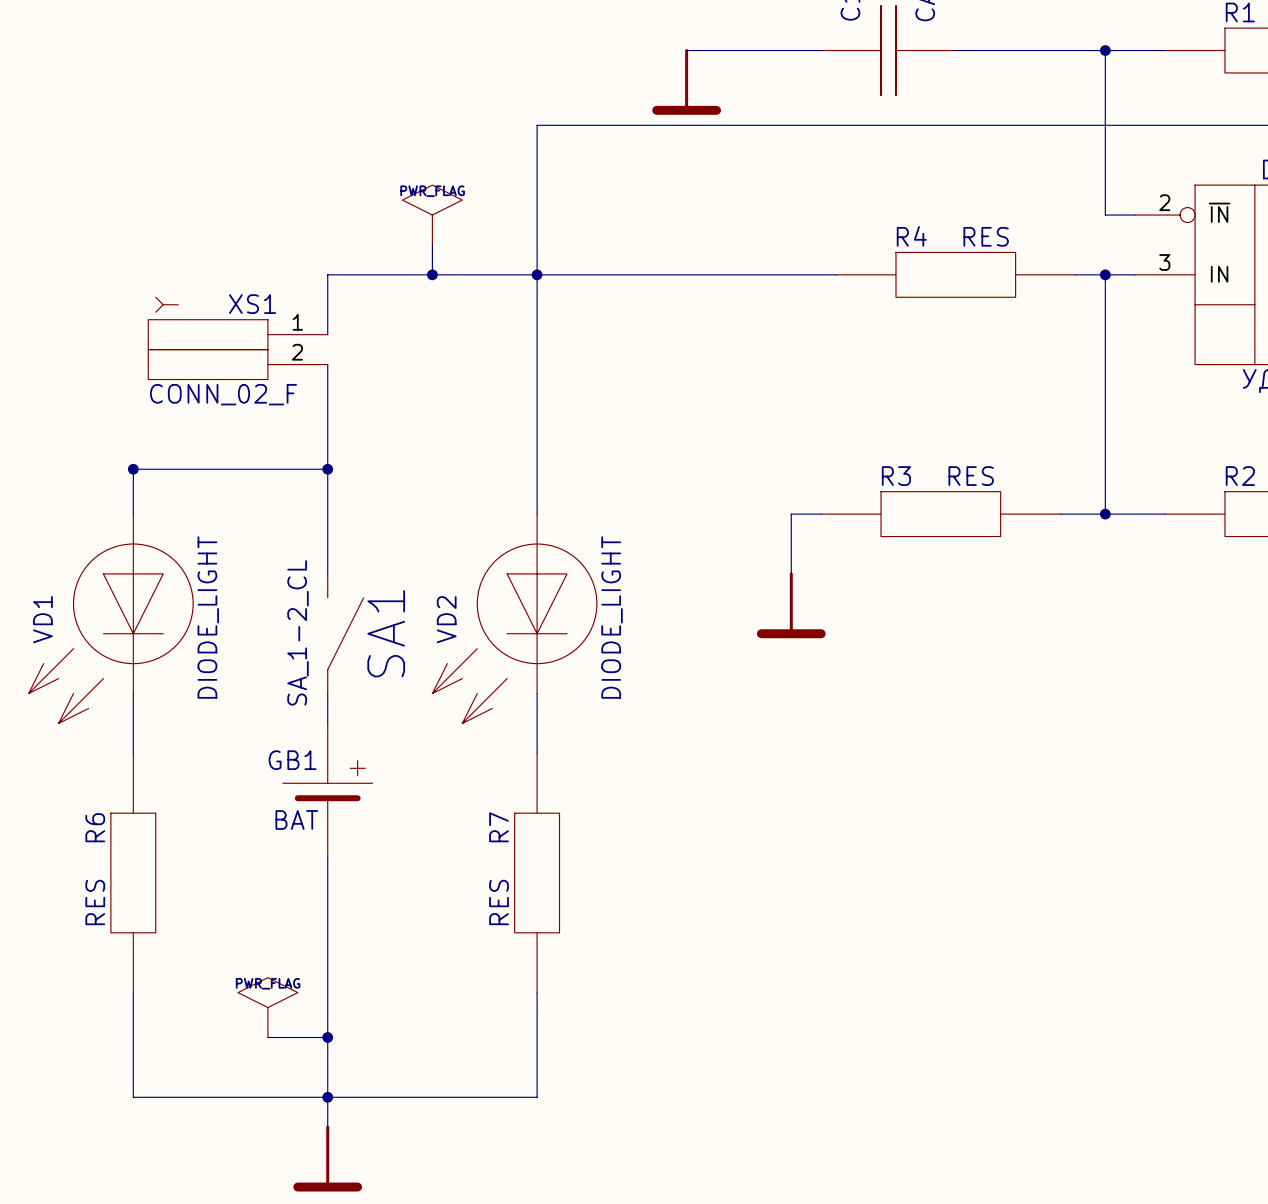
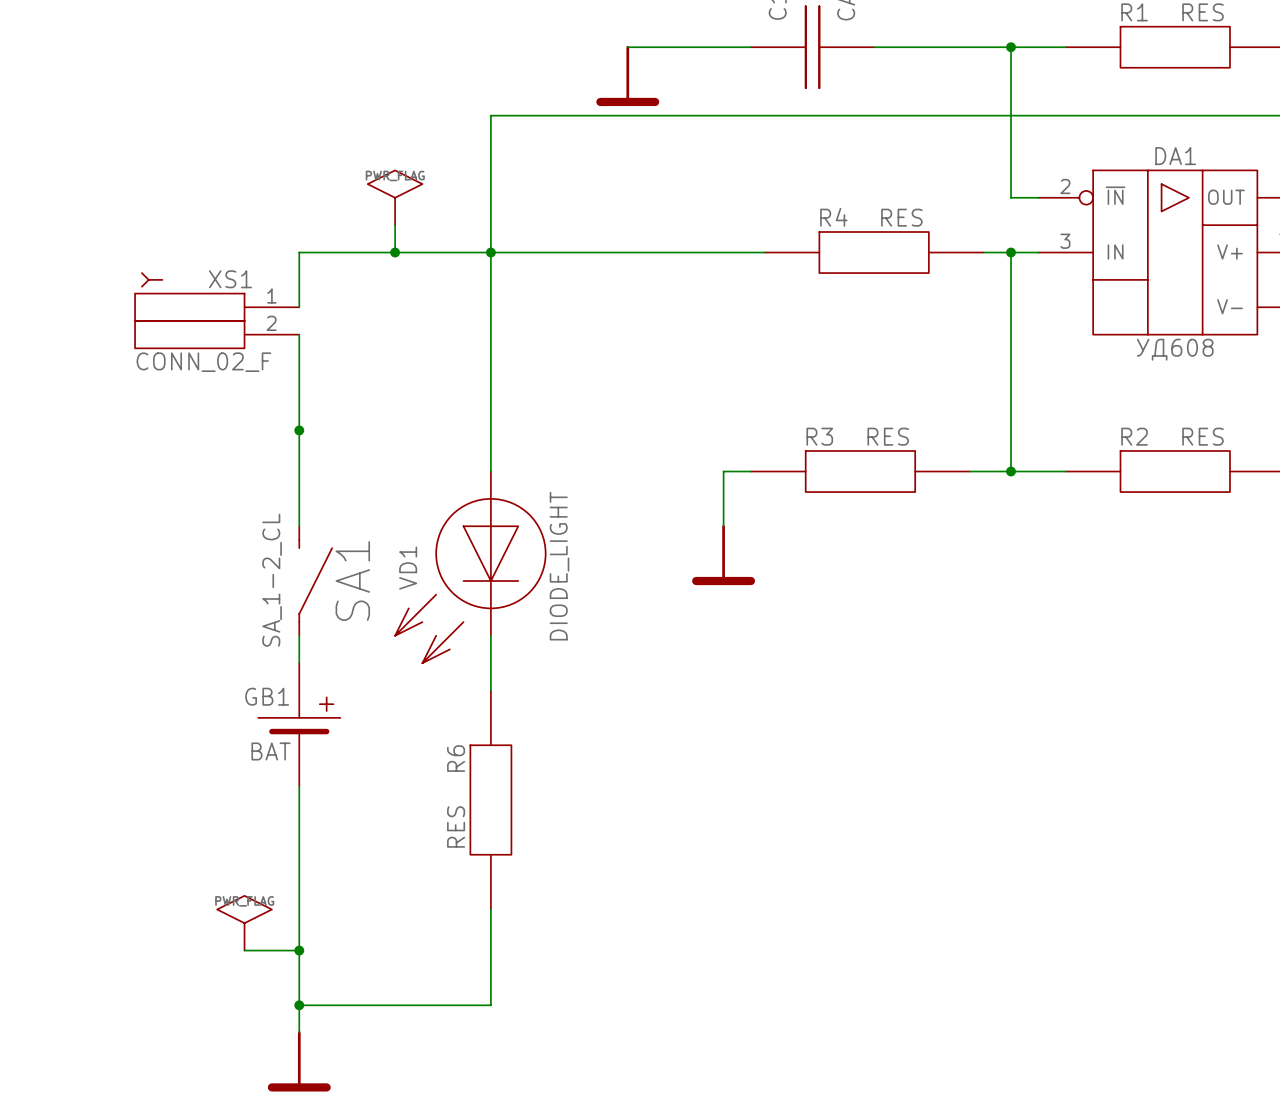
junction: (133, 469) -> none
wire: (327, 469) (133, 469) (133, 514) -> none
VD1: DIODE_LIGHT (110, 618) -> none
VD2 name: VD2 (446, 619) -> VD1 (408, 568)
wire: (133, 693) (133, 753) -> none
R7 name: R7 (499, 827) -> R6 (456, 758)
R6: RES (133, 873) -> none
wire: (133, 992) (133, 1097) (327, 1097) -> none

